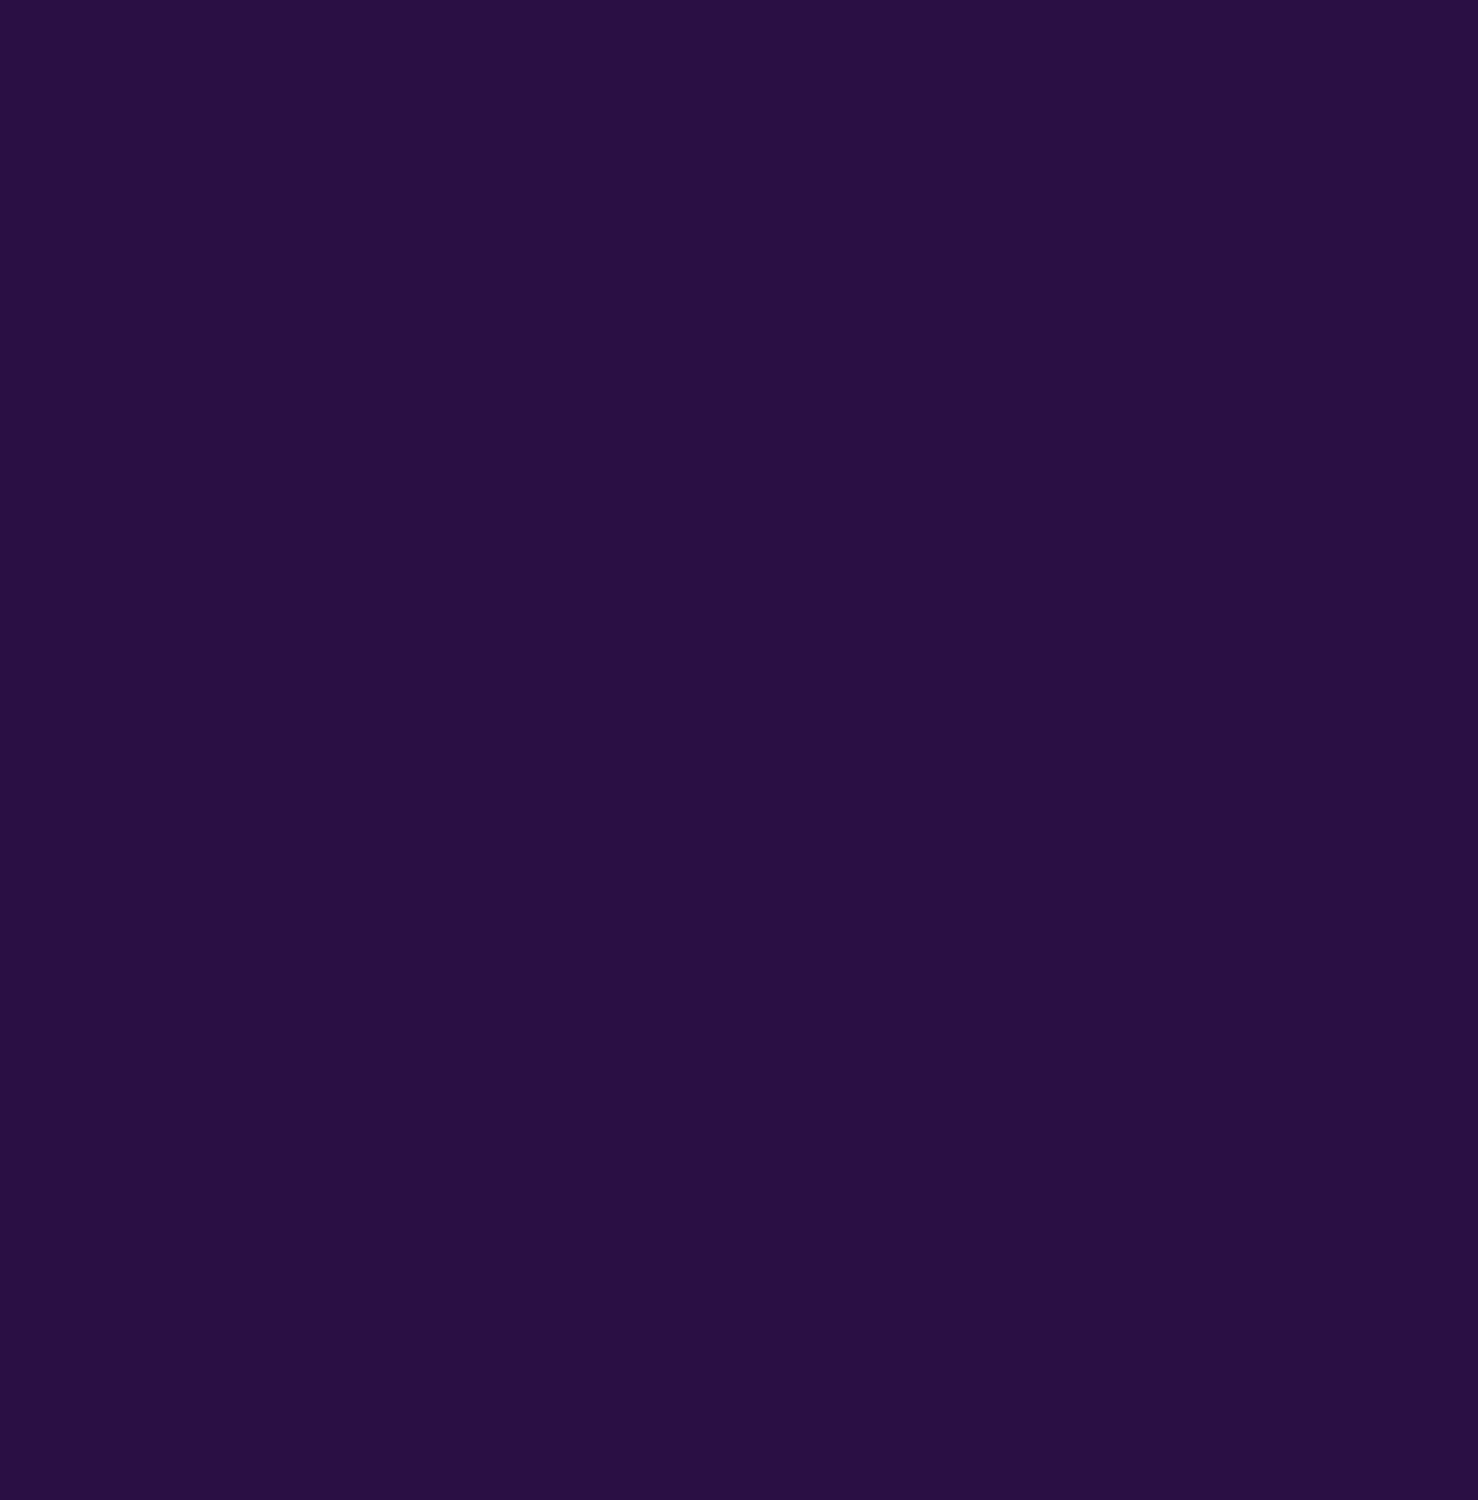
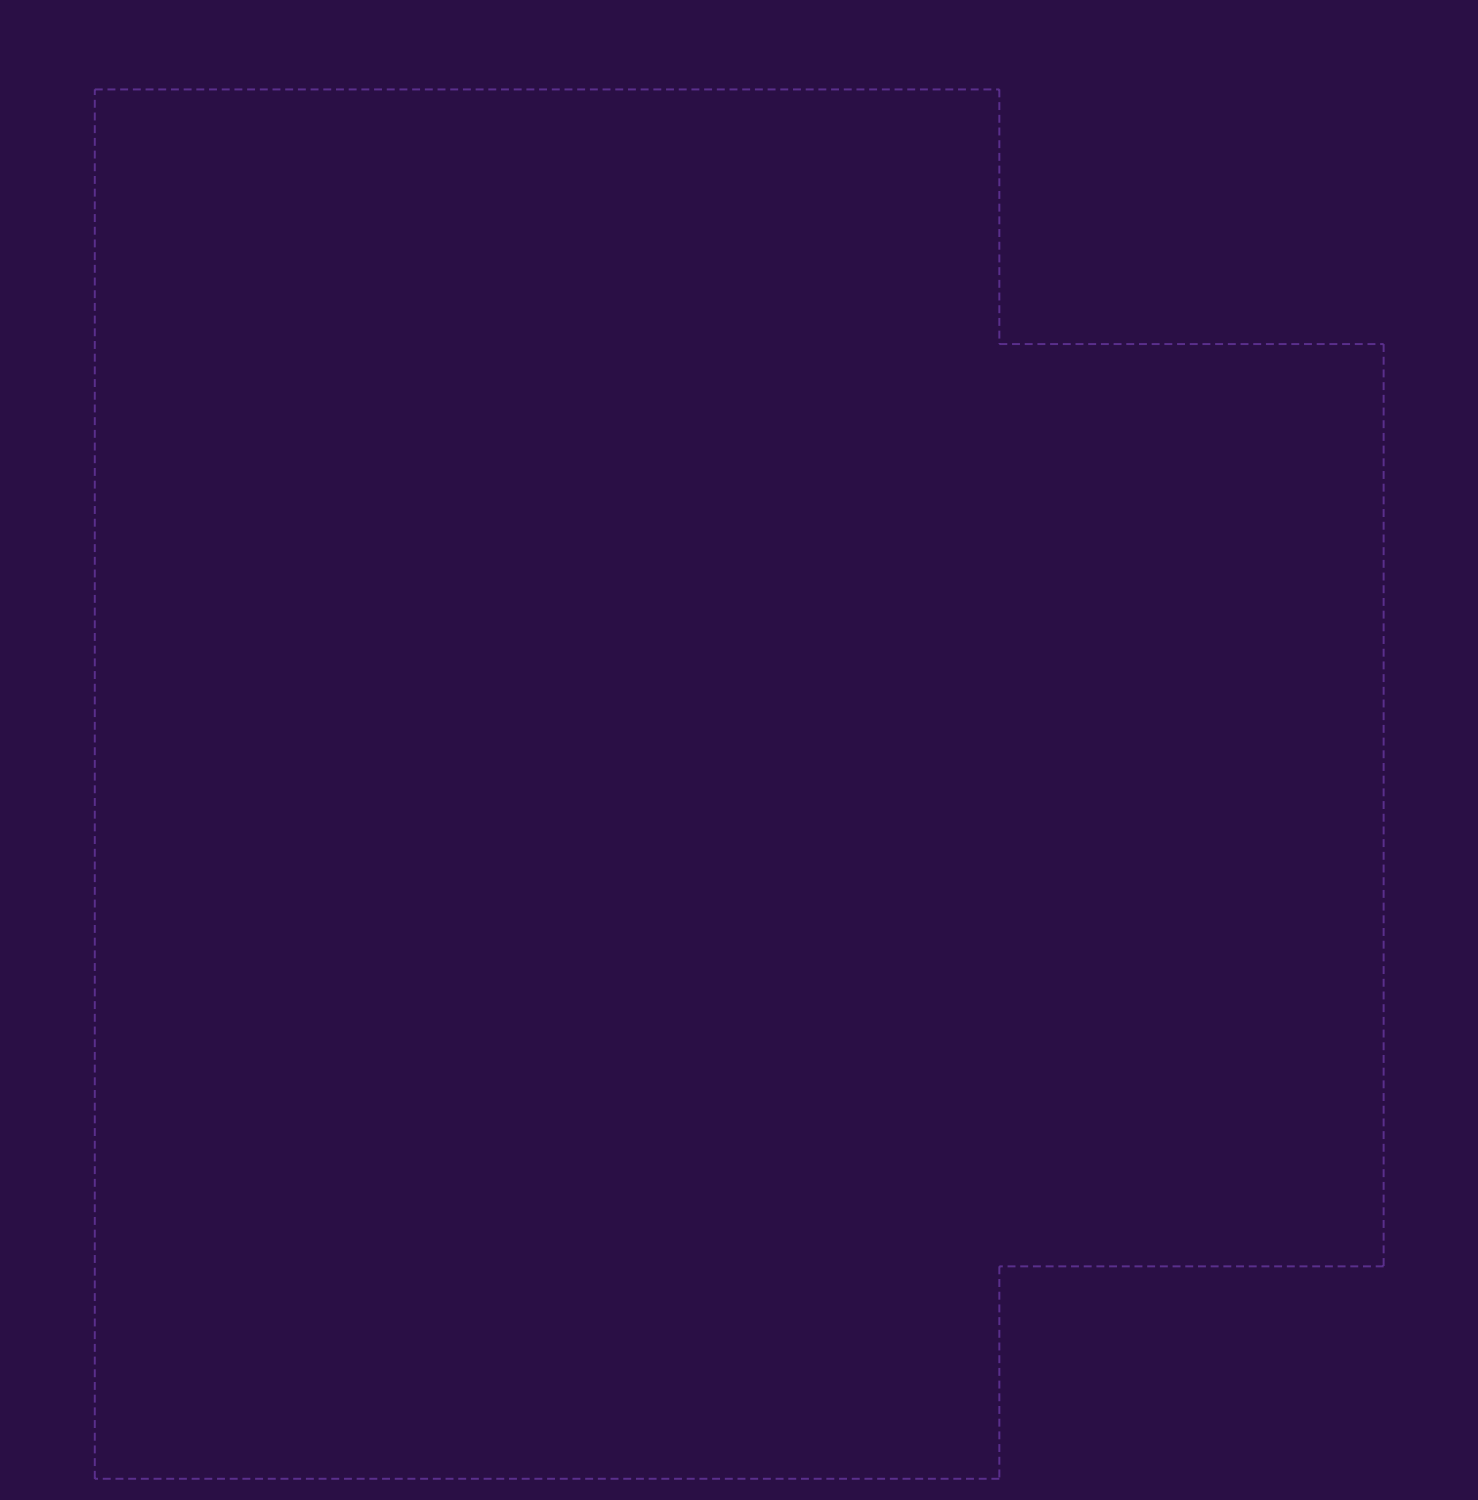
zone outline: none -> (94, 89) (94, 1478) (999, 1478) (999, 1266) (1383, 1266) (1383, 344) (999, 344) (999, 89) (94, 89)

